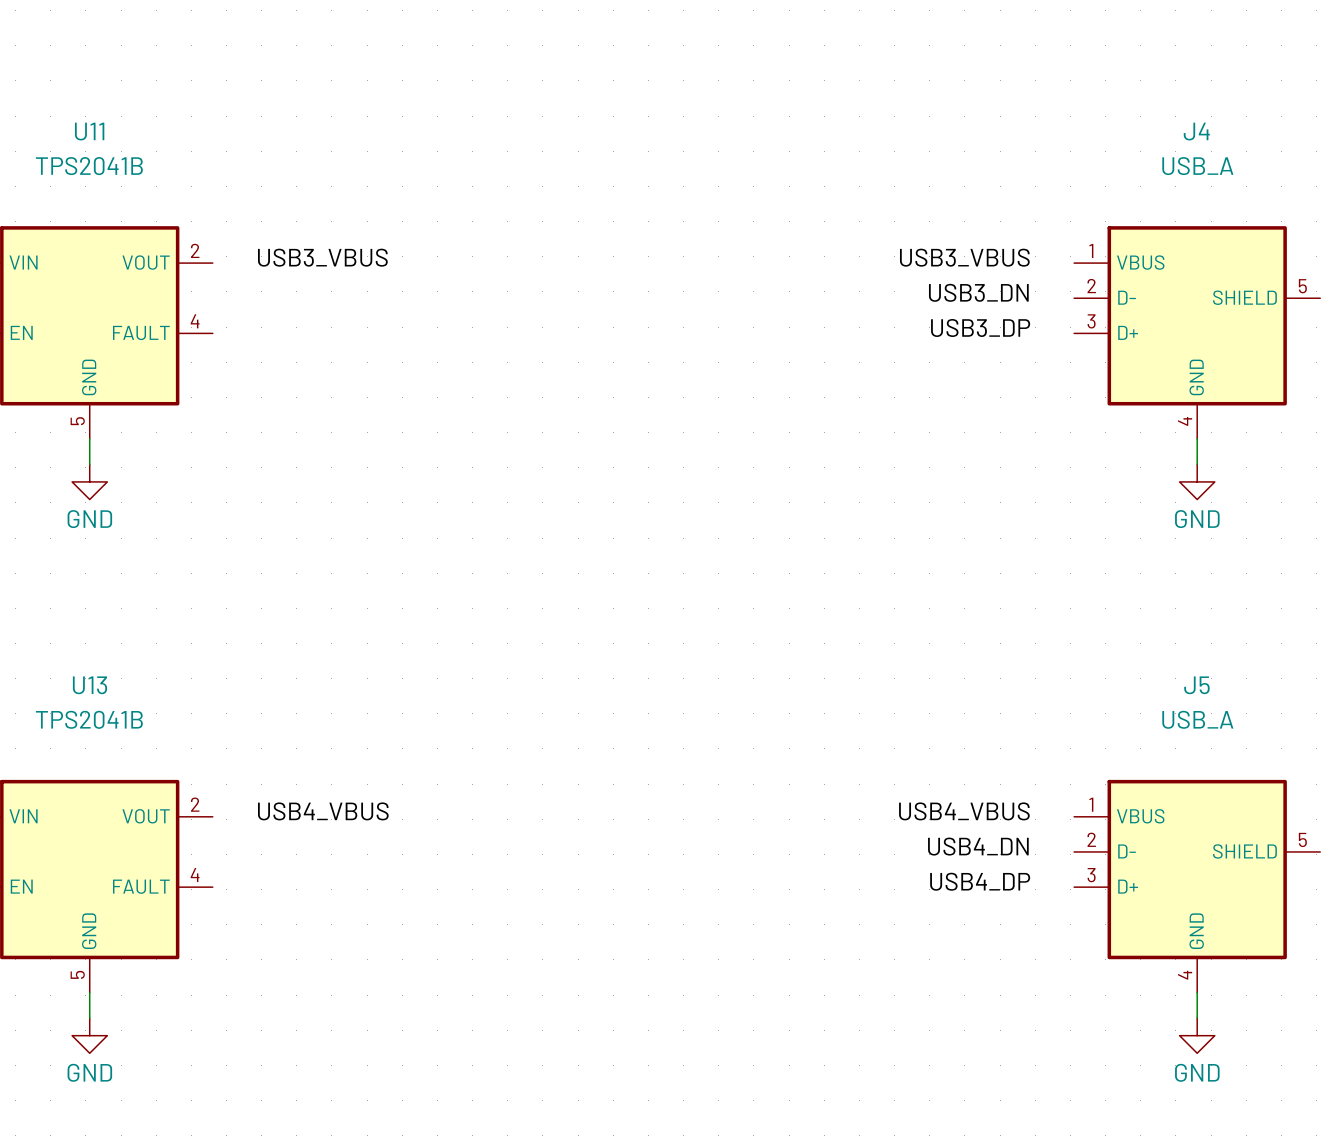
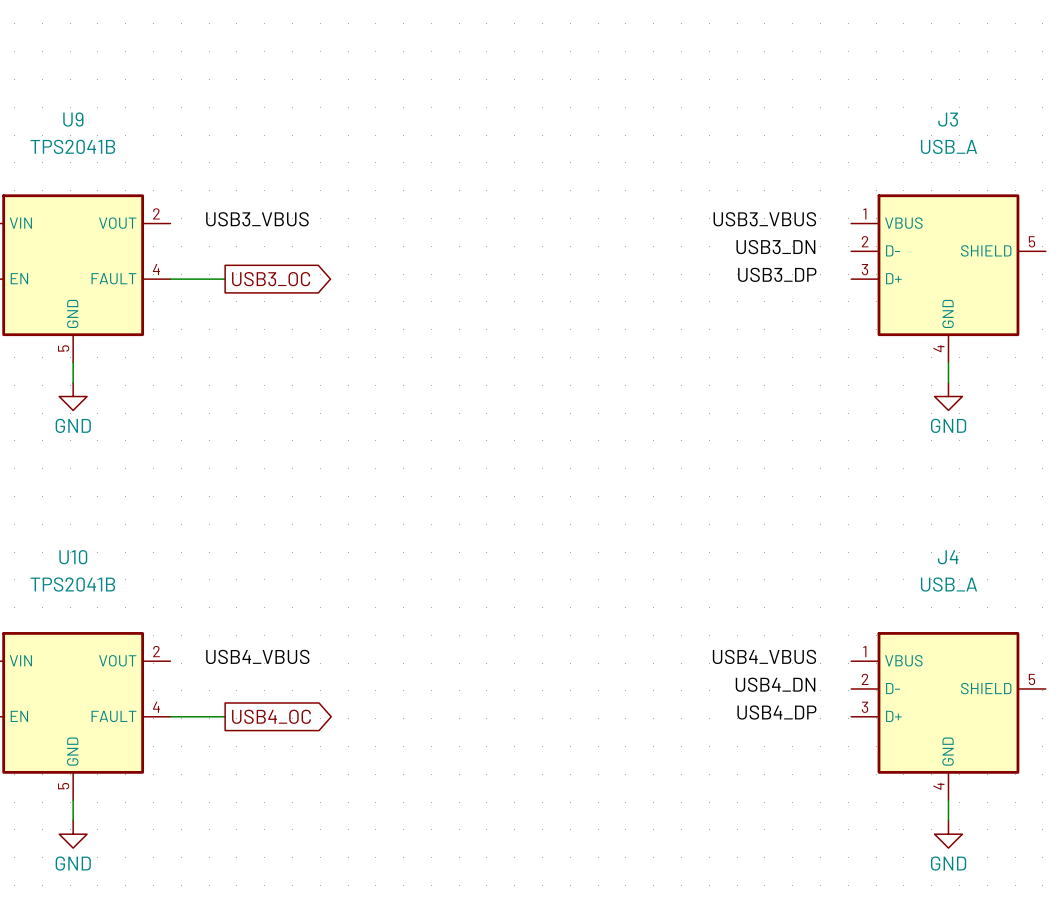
U11 name: U11 (89, 131) -> U9 (73, 119)
J4 name: J4 (1196, 131) -> J3 (948, 119)
wire: none -> (170, 279) (225, 279)
global label: none -> USB3_OC (271, 279)
U13 name: U13 (89, 685) -> U10 (73, 557)
J5 name: J5 (1196, 685) -> J4 (948, 557)
wire: none -> (170, 716) (225, 716)
global label: none -> USB4_OC (271, 716)

